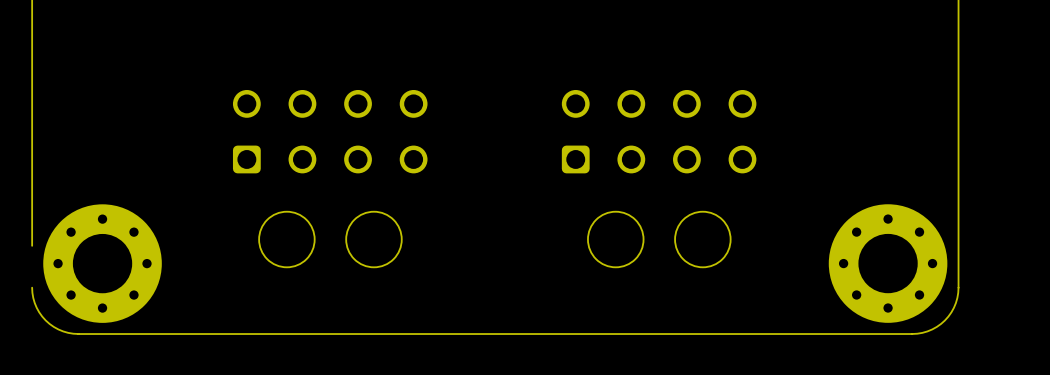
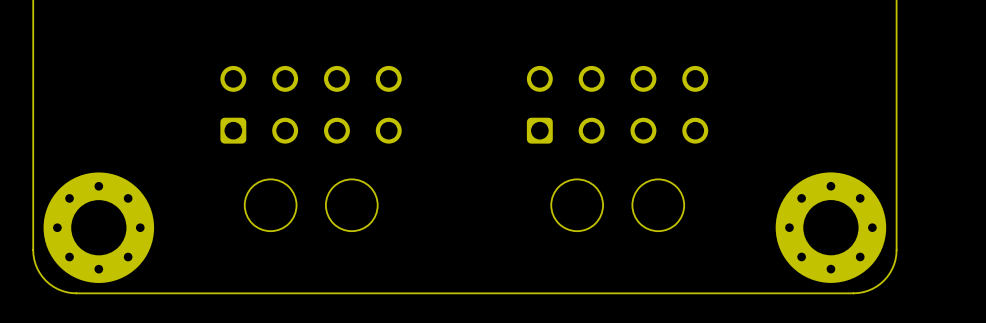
board edge: none -> (33, 211) (33, 250)

